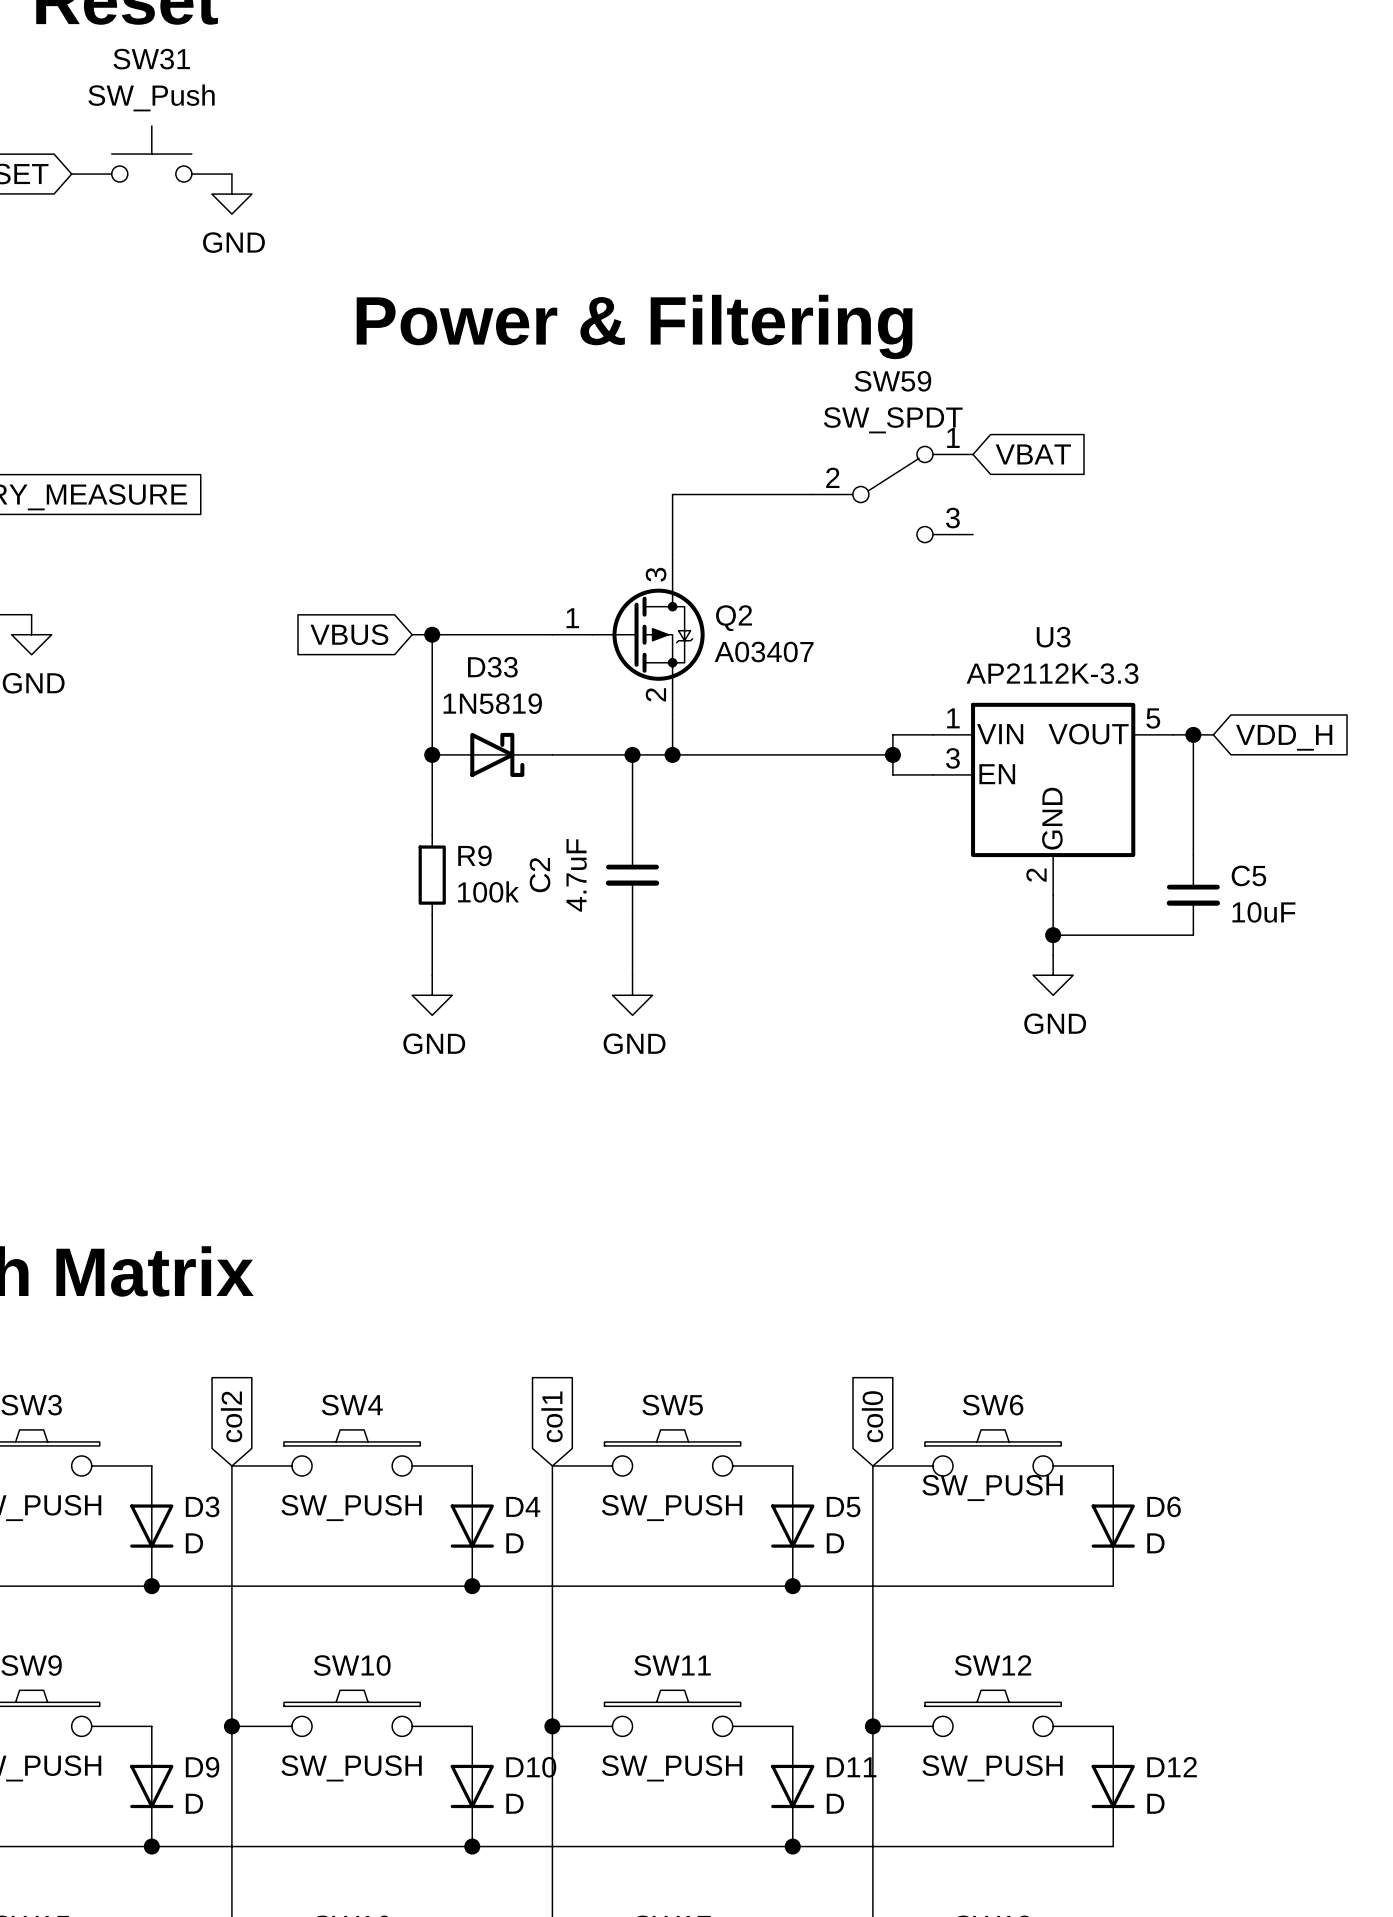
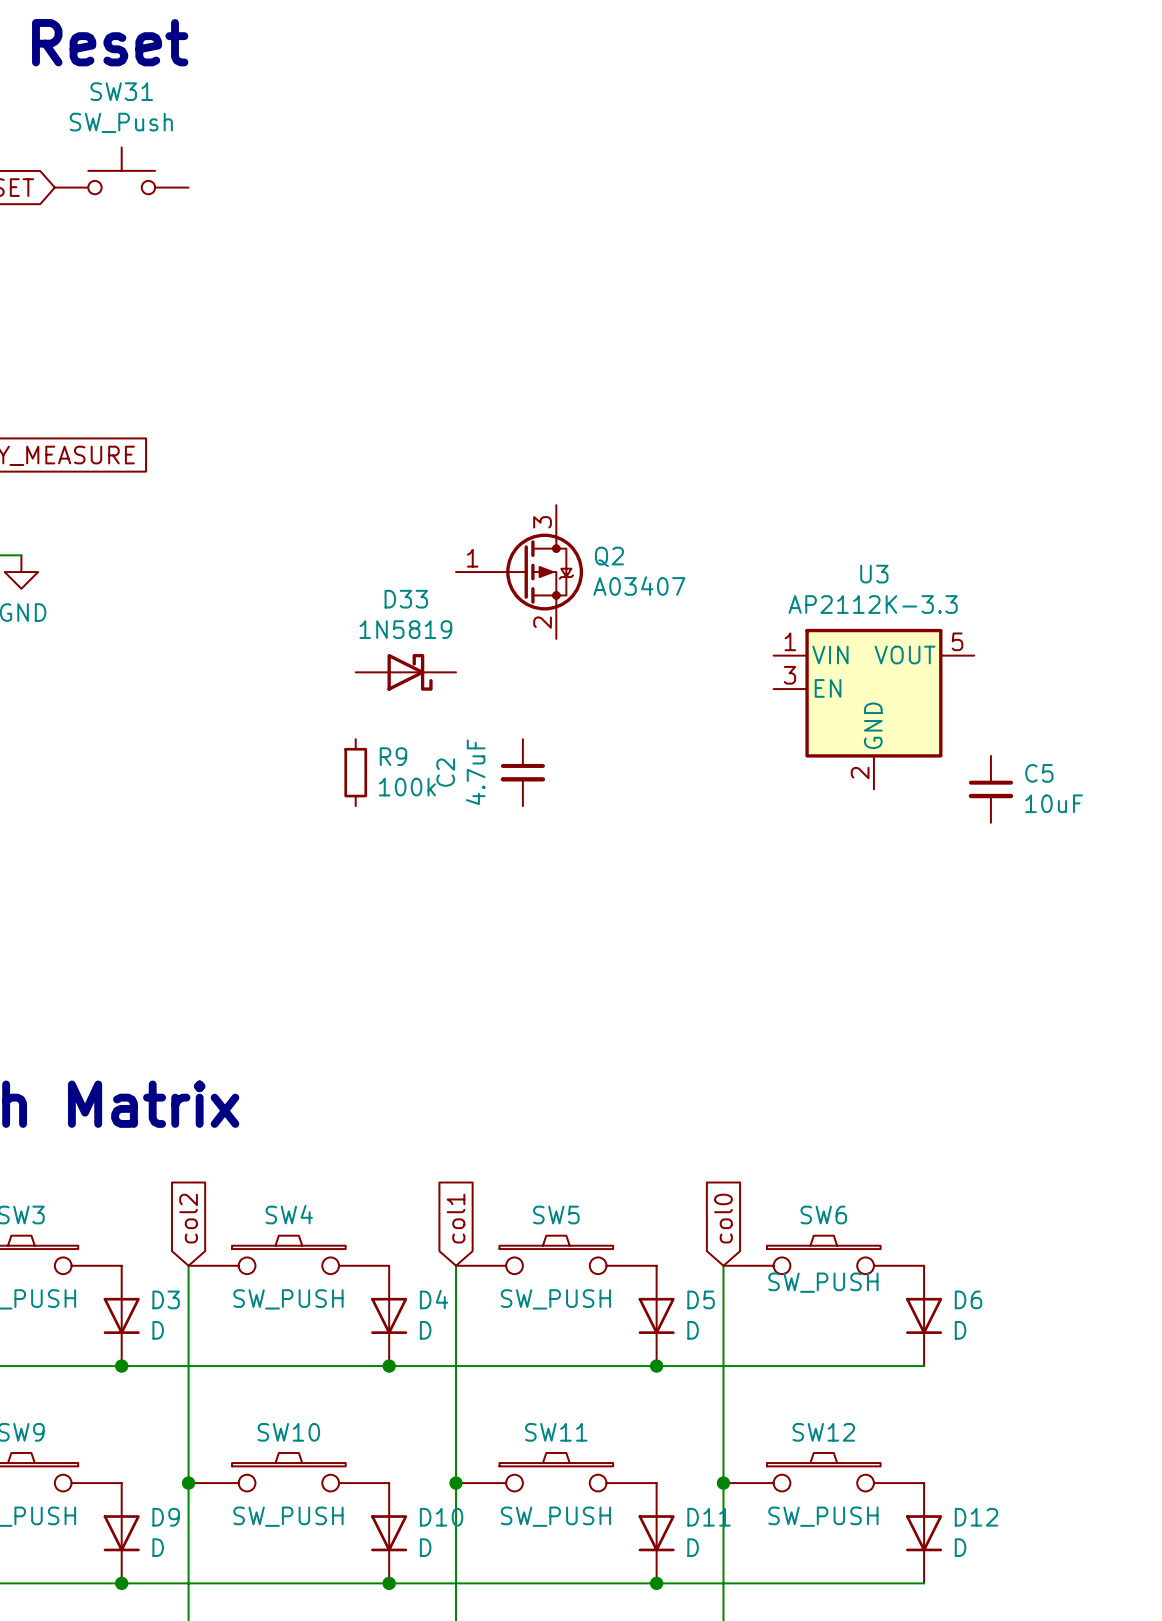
power symbol: GND (231, 194) -> none
text: Power & Filtering (634, 326) -> none
global label: VBAT (1033, 454) -> none
wire: (812, 494) (672, 494) (672, 554) -> none
SW59: SW_SPDT (892, 494) -> none
global label: VBUS (349, 634) -> none
wire: (412, 634) (552, 634) -> none
wire: (432, 634) (432, 835) -> none
junction: (432, 634) -> none
wire: (672, 714) (672, 754) -> none
wire: (932, 734) (892, 734) (892, 774) (932, 774) -> none
wire: (1173, 734) (1213, 734) -> none
wire: (1193, 734) (1193, 855) -> none
junction: (1193, 734) -> none
global label: VDD_H (1284, 737) -> none
junction: (432, 754) -> none
wire: (552, 754) (892, 754) -> none
wire: (632, 754) (632, 835) -> none
junction: (632, 754) -> none
junction: (672, 754) -> none
junction: (892, 754) -> none
wire: (1053, 895) (1053, 955) -> none
wire: (432, 915) (432, 975) -> none
wire: (632, 915) (632, 975) -> none
wire: (1053, 935) (1193, 935) -> none
junction: (1053, 935) -> none
power symbol: GND (1053, 975) -> none
power symbol: GND (432, 995) -> none
power symbol: GND (632, 995) -> none

